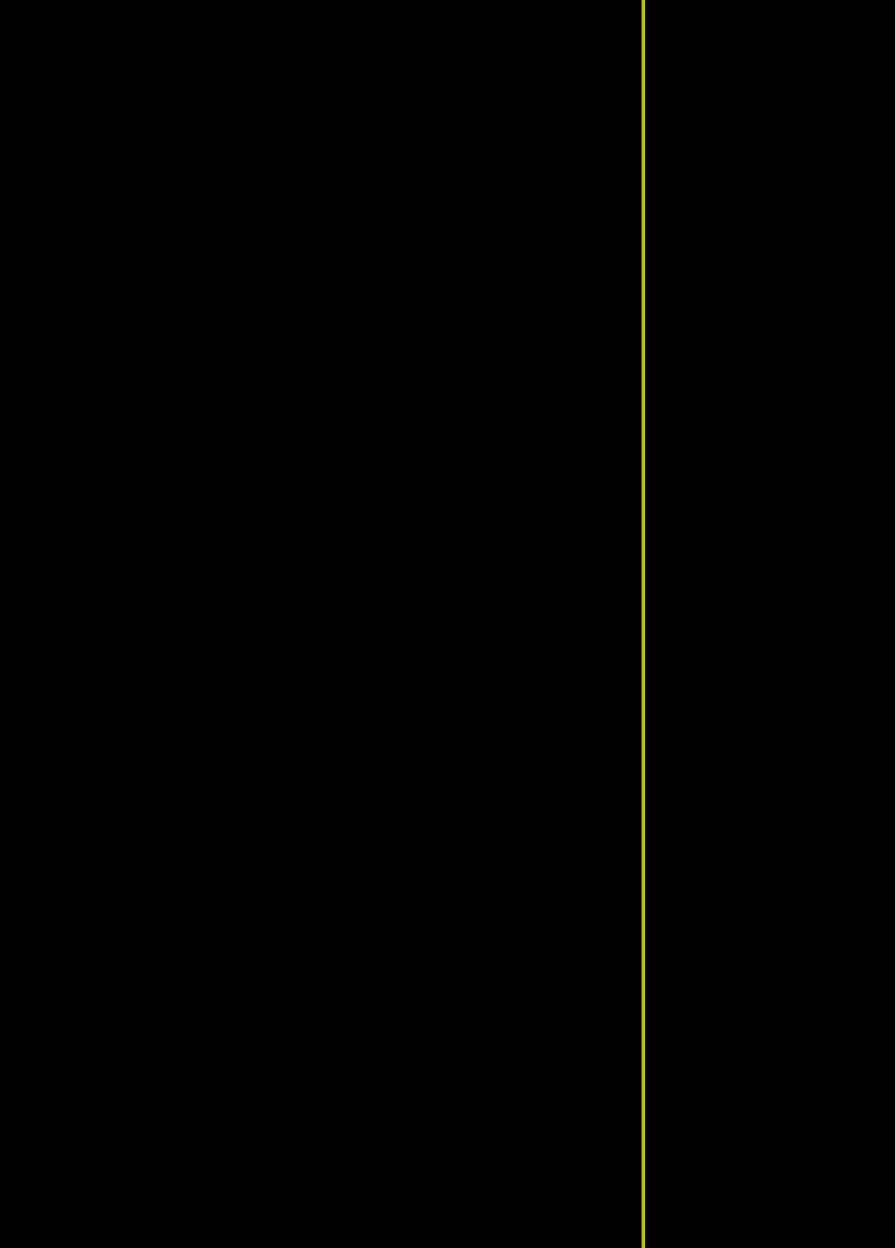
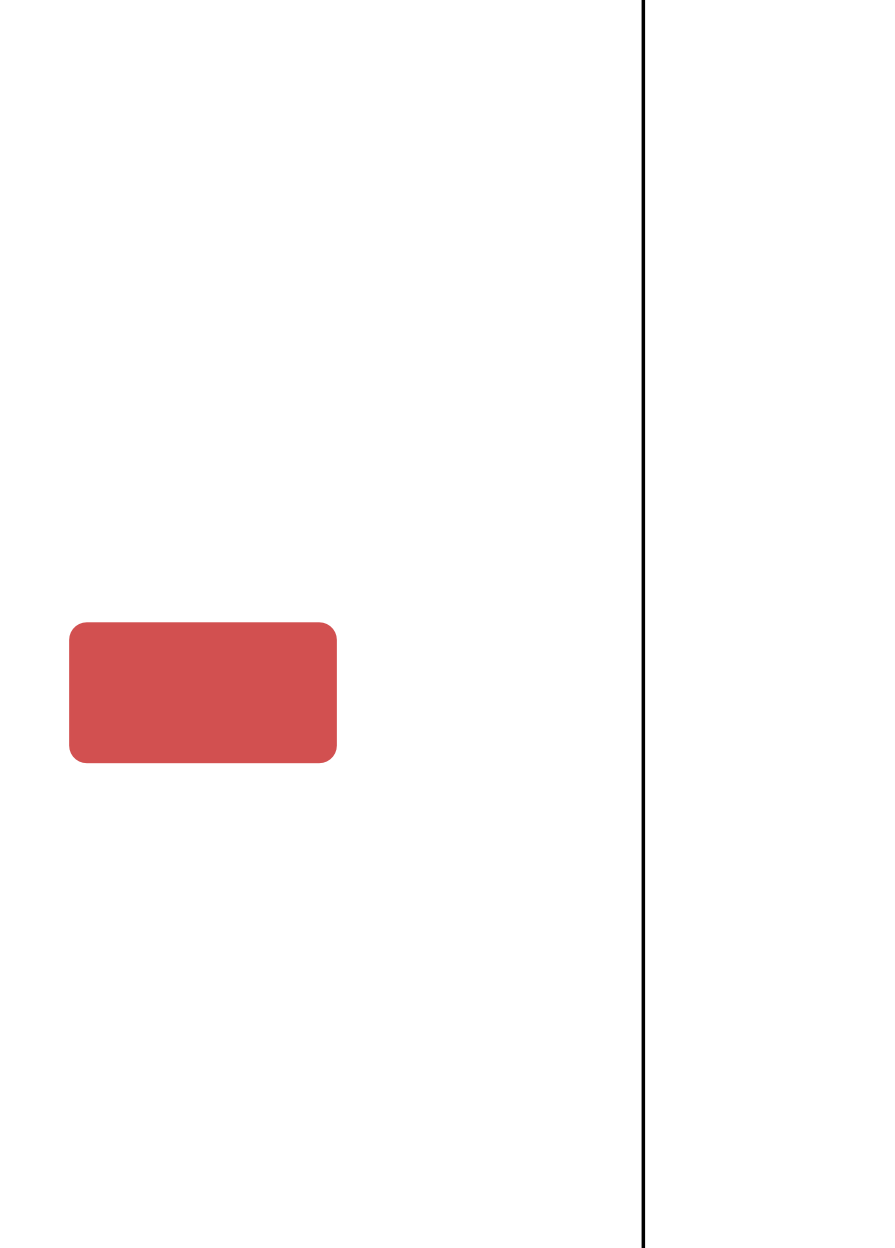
part: none -> (203, 692)

